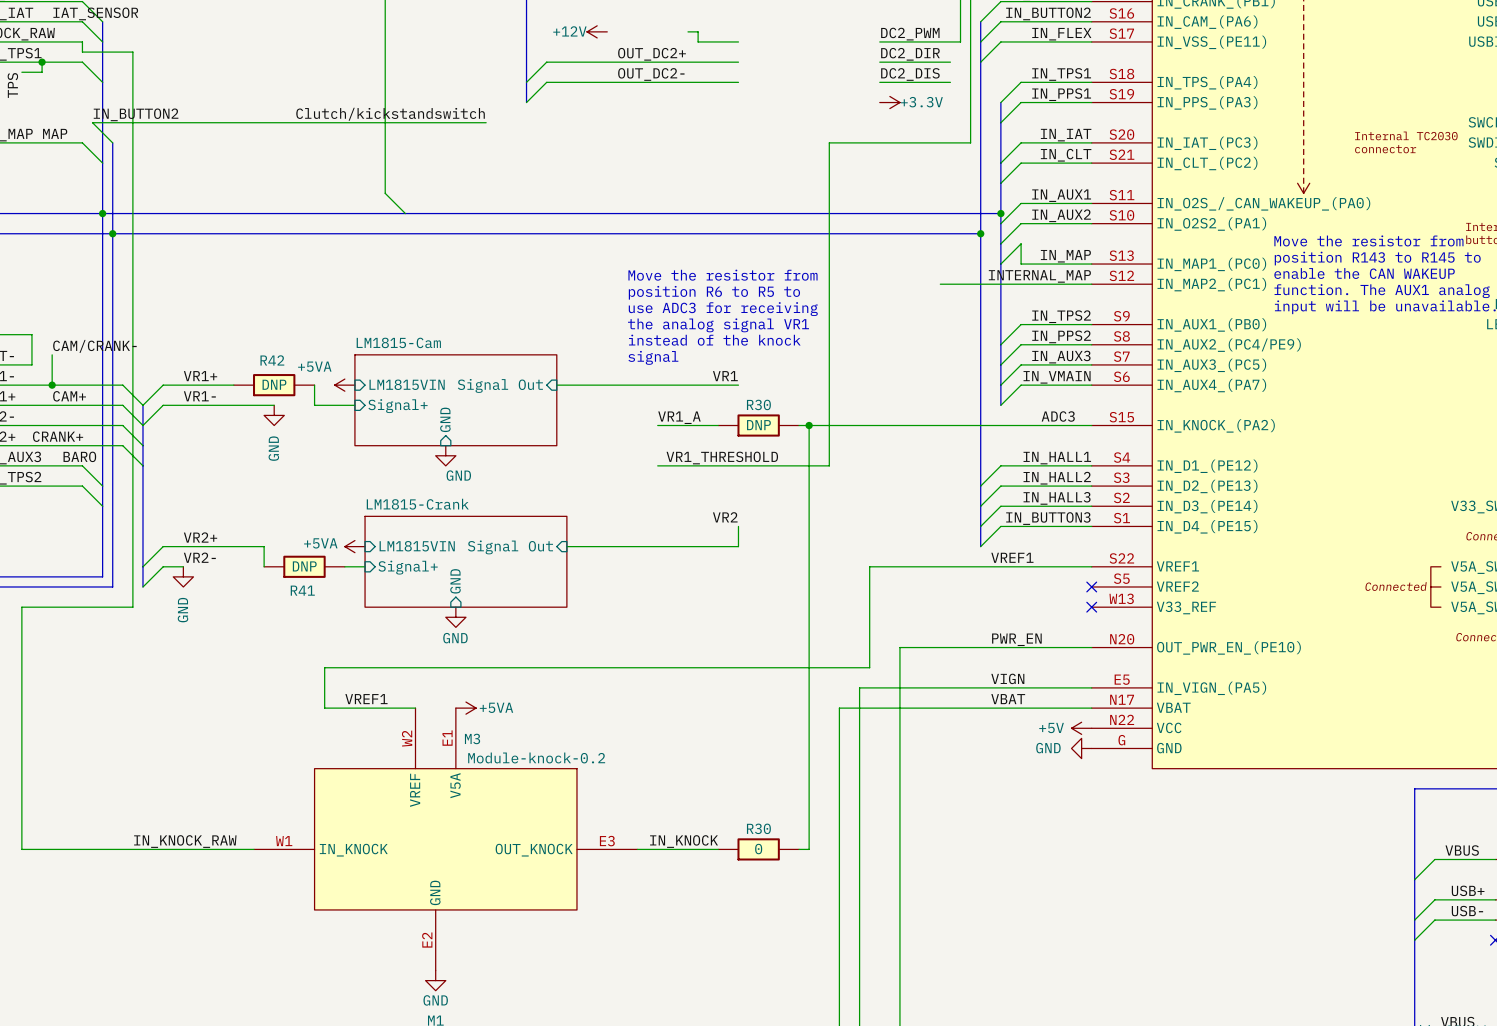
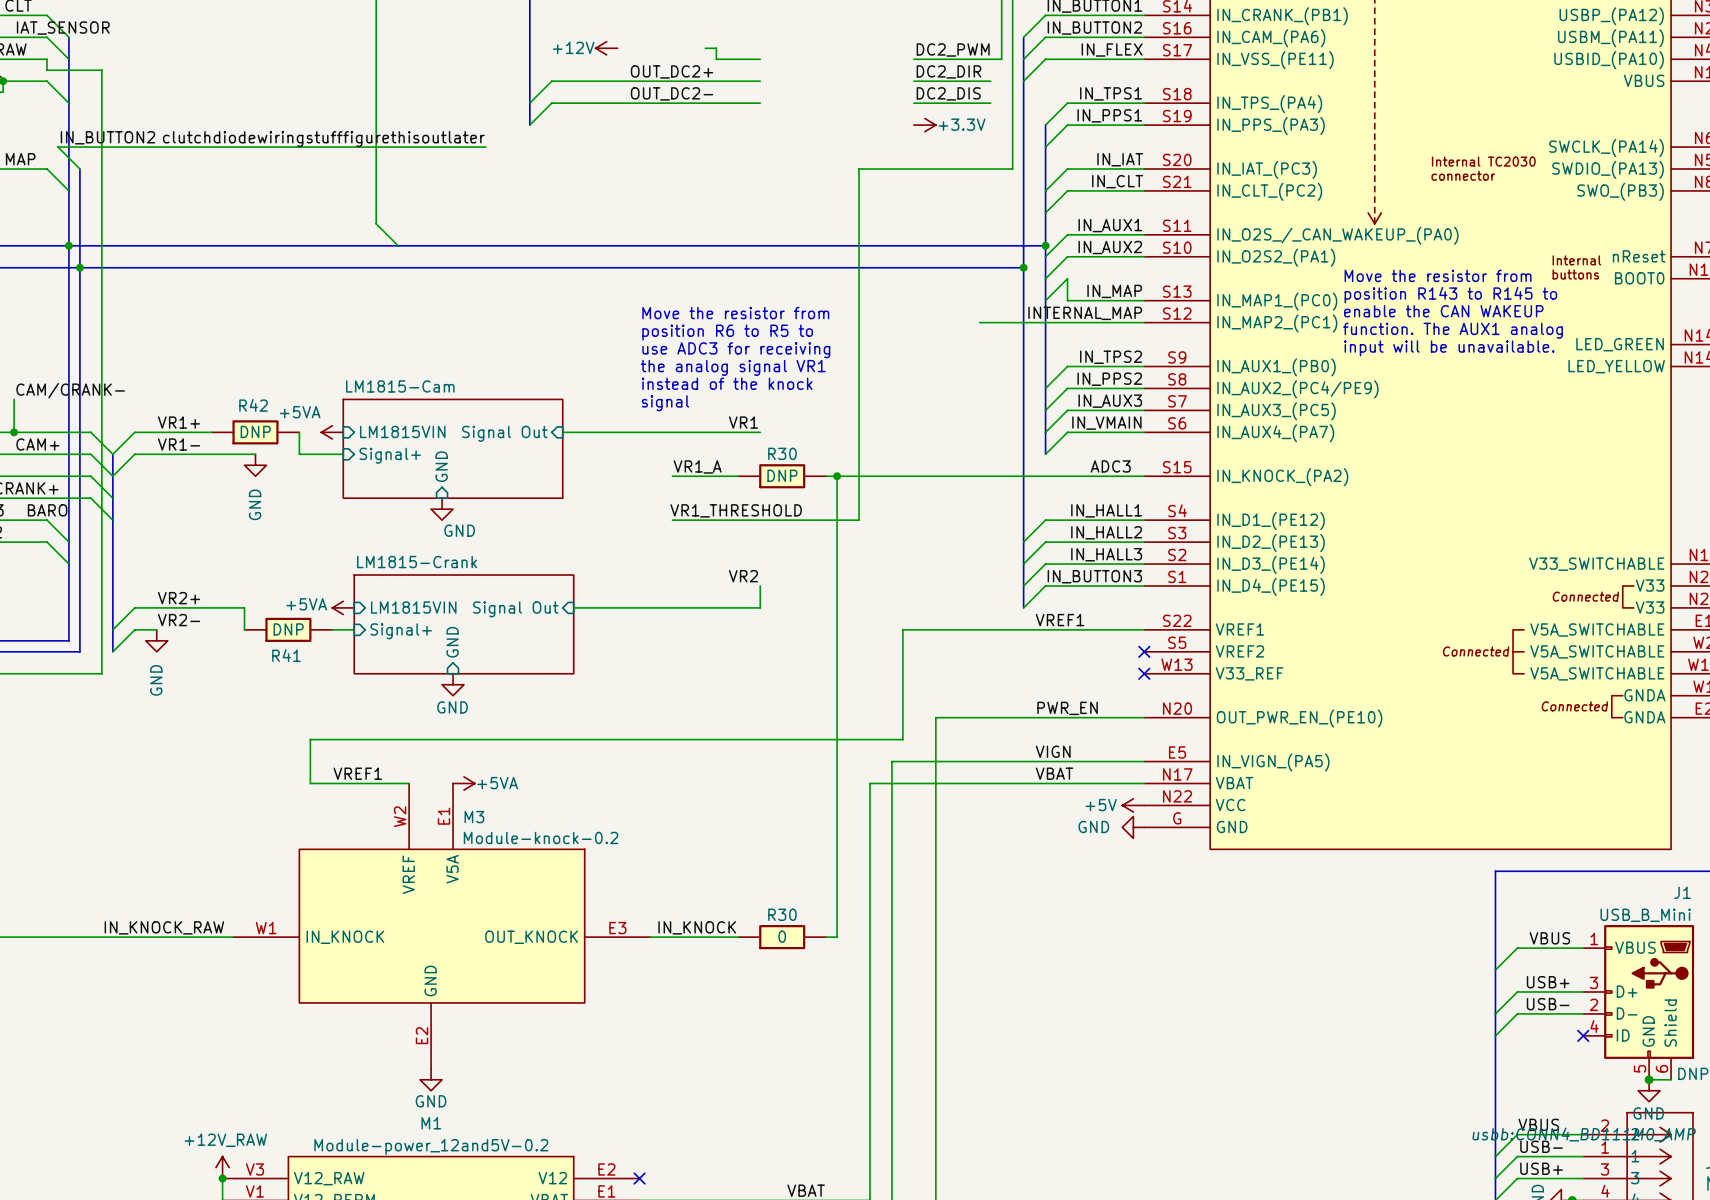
label: Clutch/kickstandswitch (390, 114) -> clutchdiodewiringstufffigurethisoutlater (323, 139)

